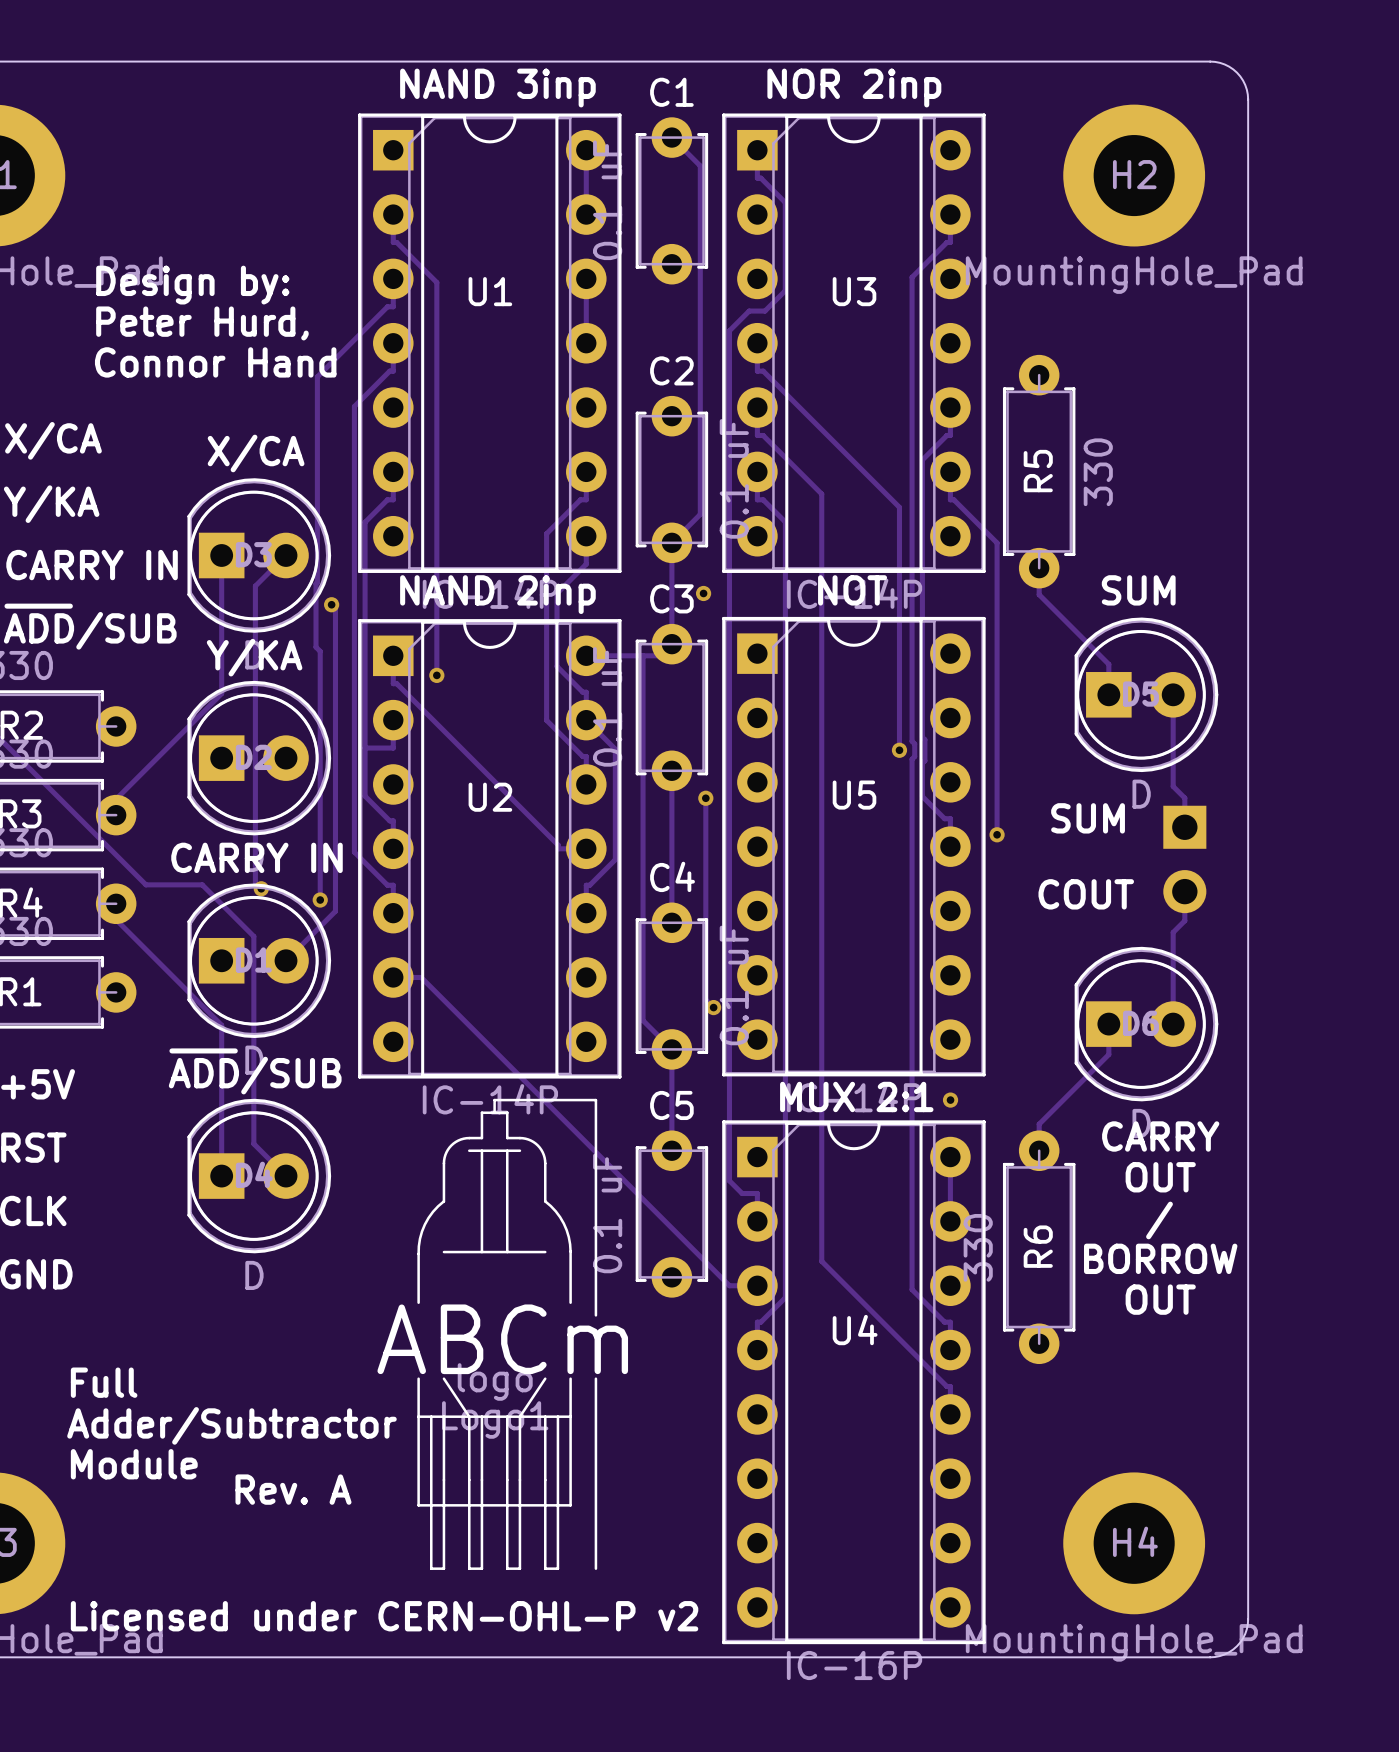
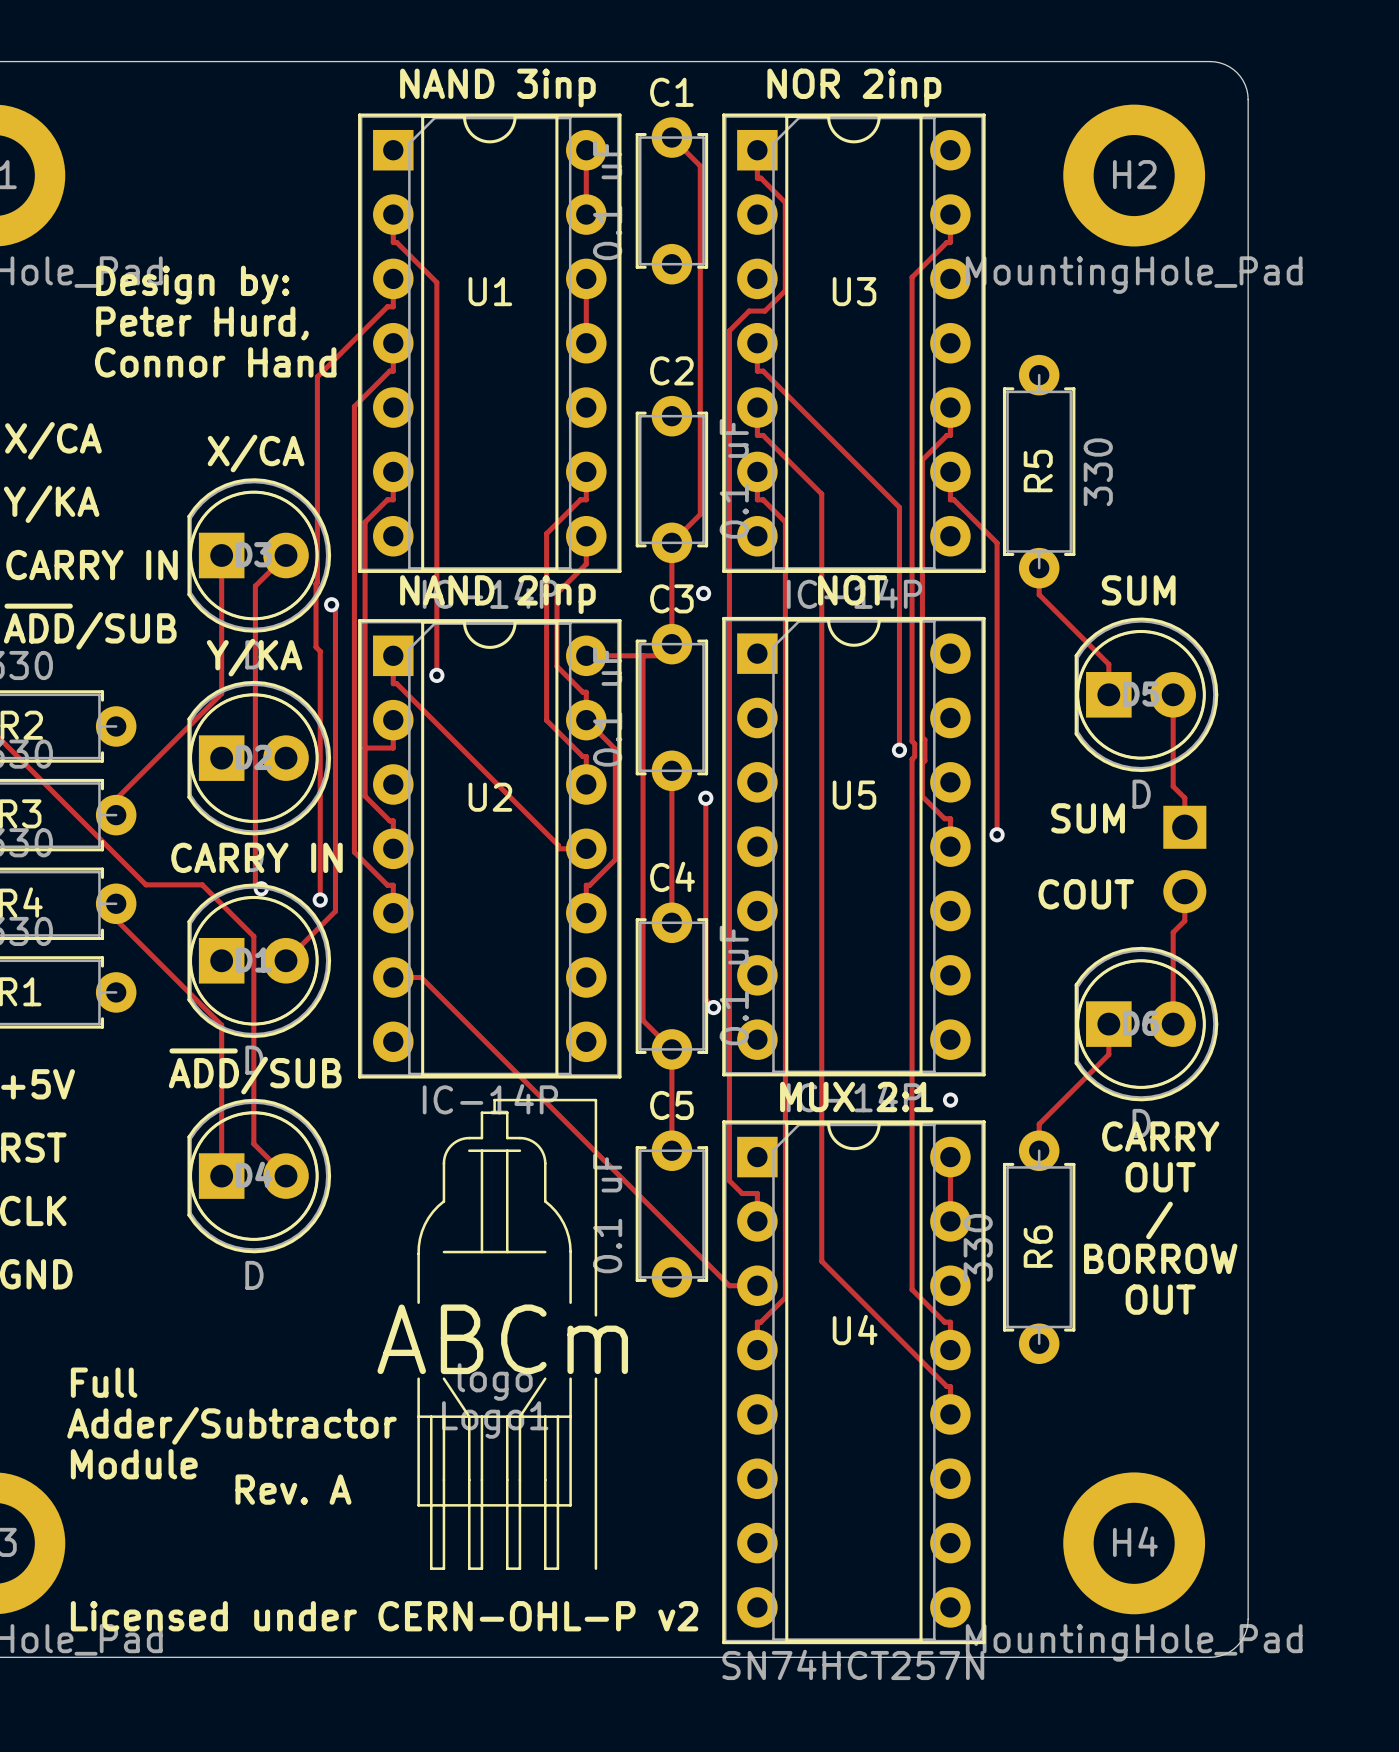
U4 value: IC-16P (854, 1665) -> SN74HCT257N (853, 1664)

